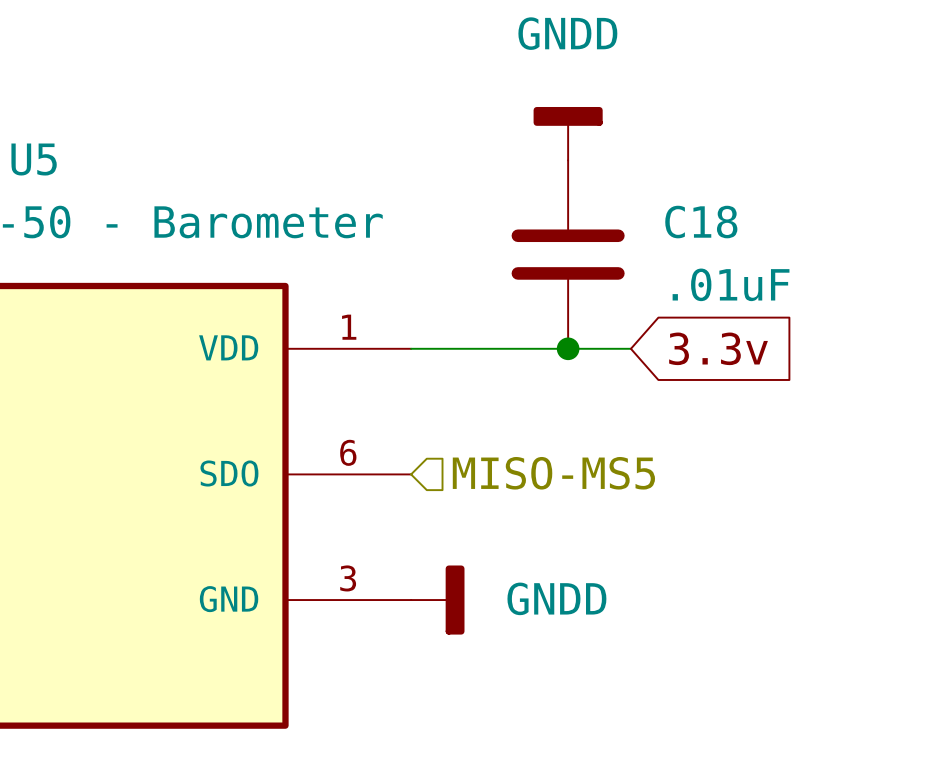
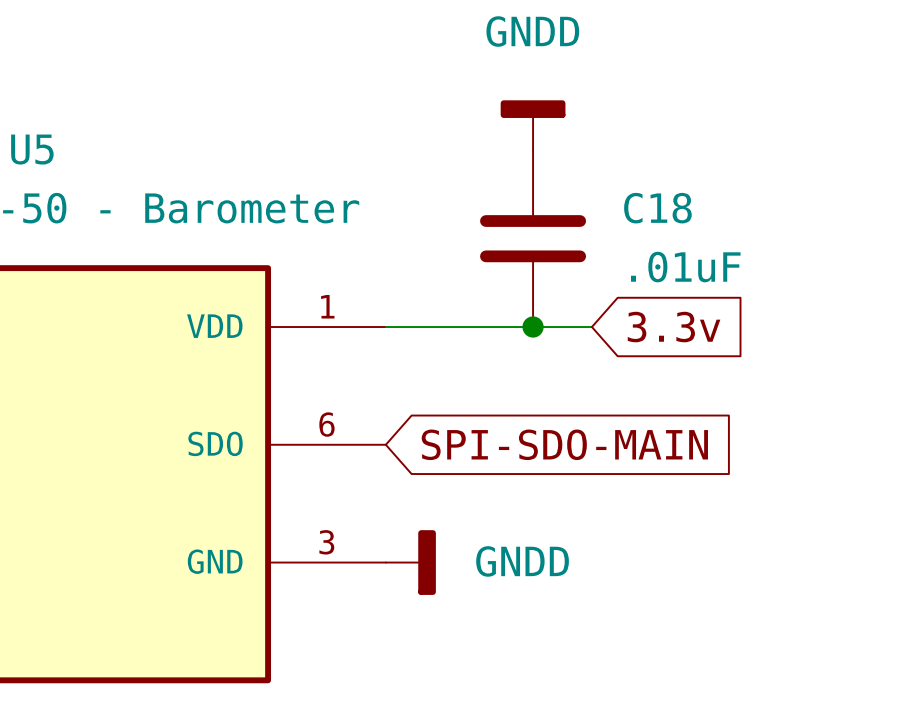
hierarchical label: MISO-MS5 (553, 473) -> none
global label: none -> SPI-SDO-MAIN (564, 444)

